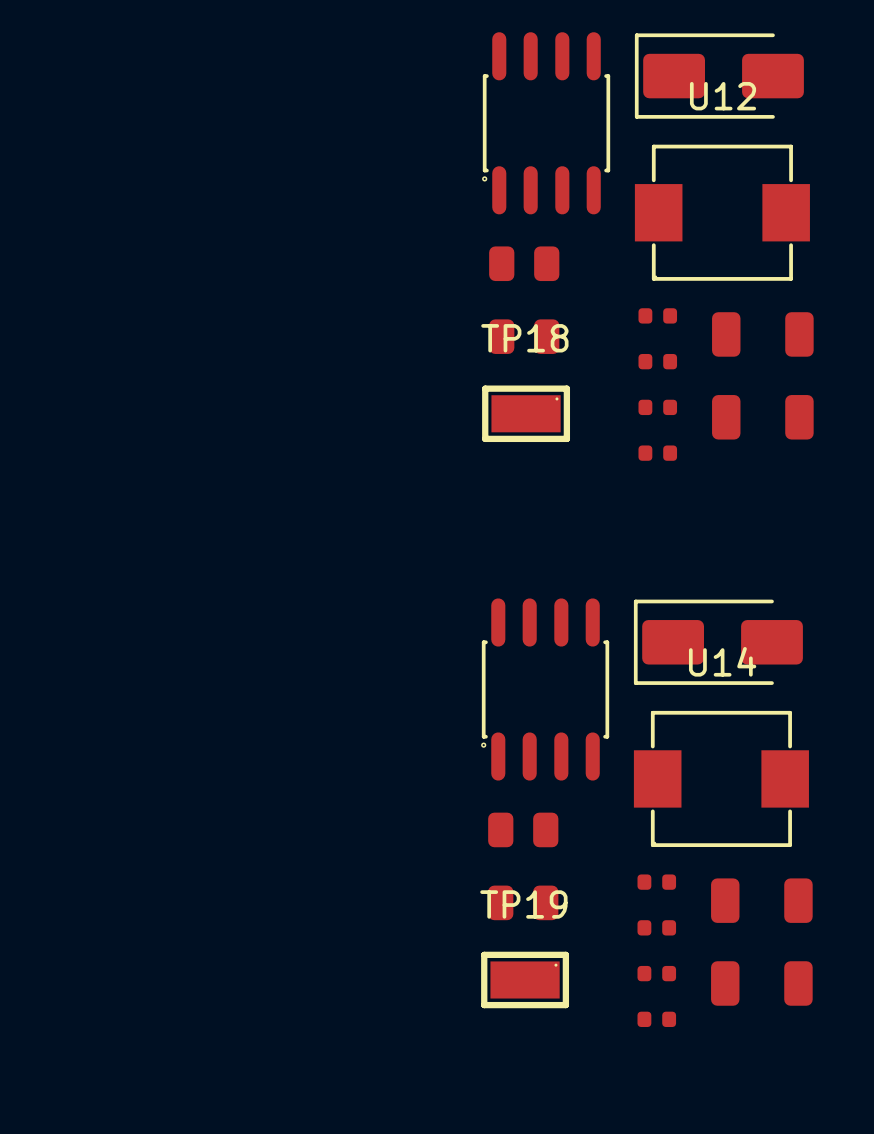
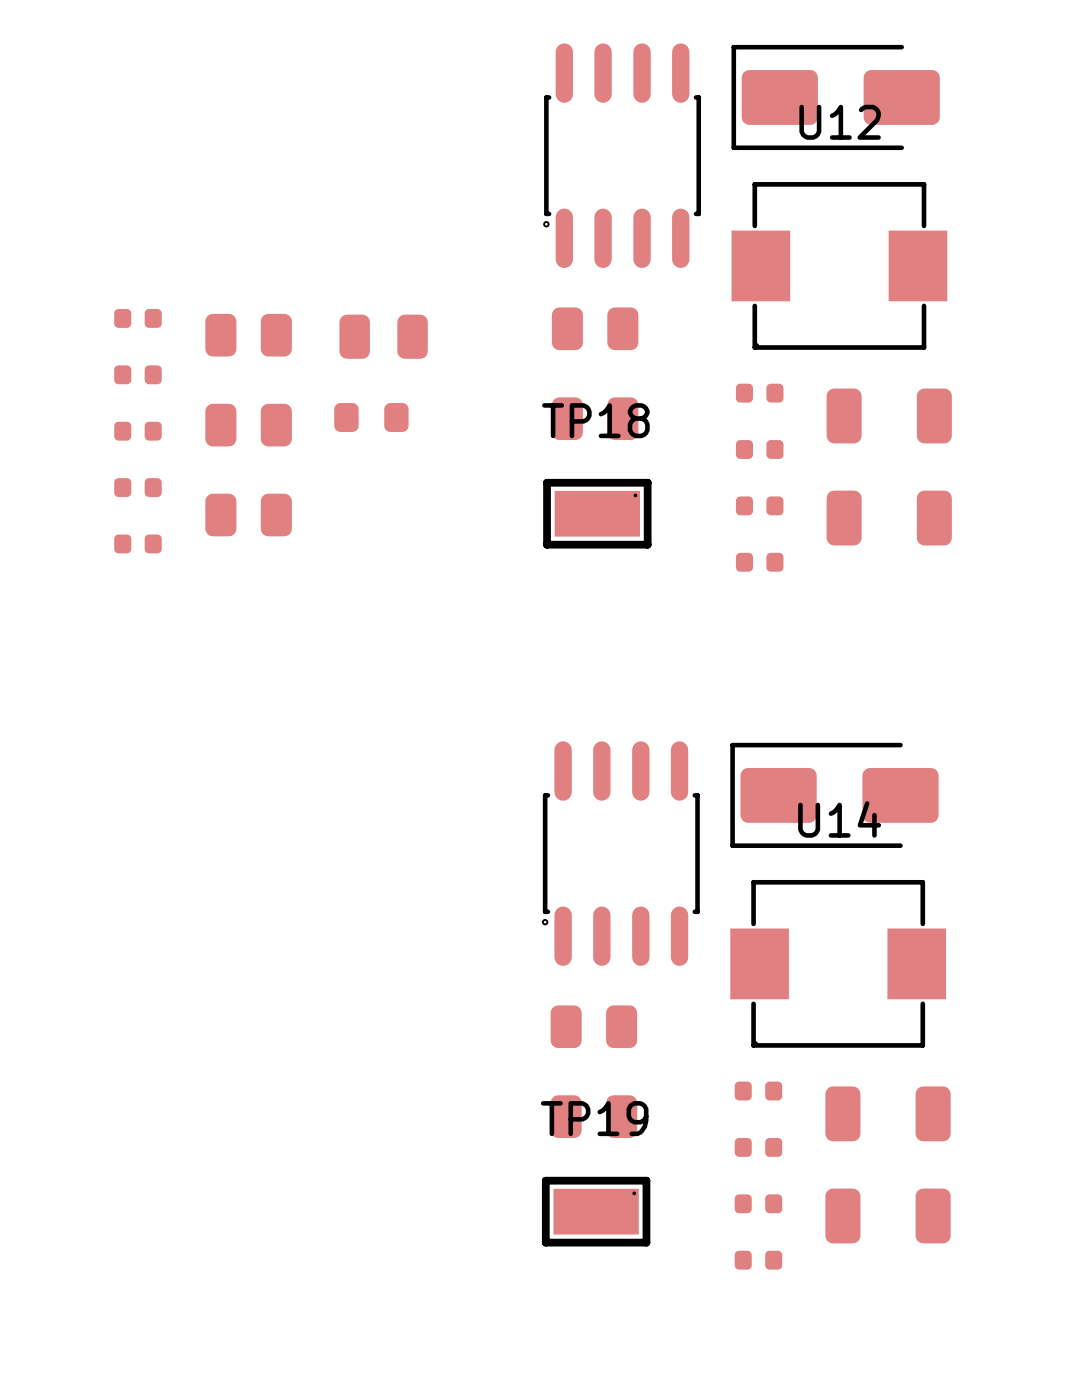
part: none -> (137, 318)
part: none -> (248, 335)
part: none -> (383, 336)
part: none -> (137, 374)
part: none -> (371, 417)
part: none -> (248, 425)
part: none -> (137, 431)
part: none -> (137, 487)
part: none -> (248, 515)
part: none -> (137, 543)

